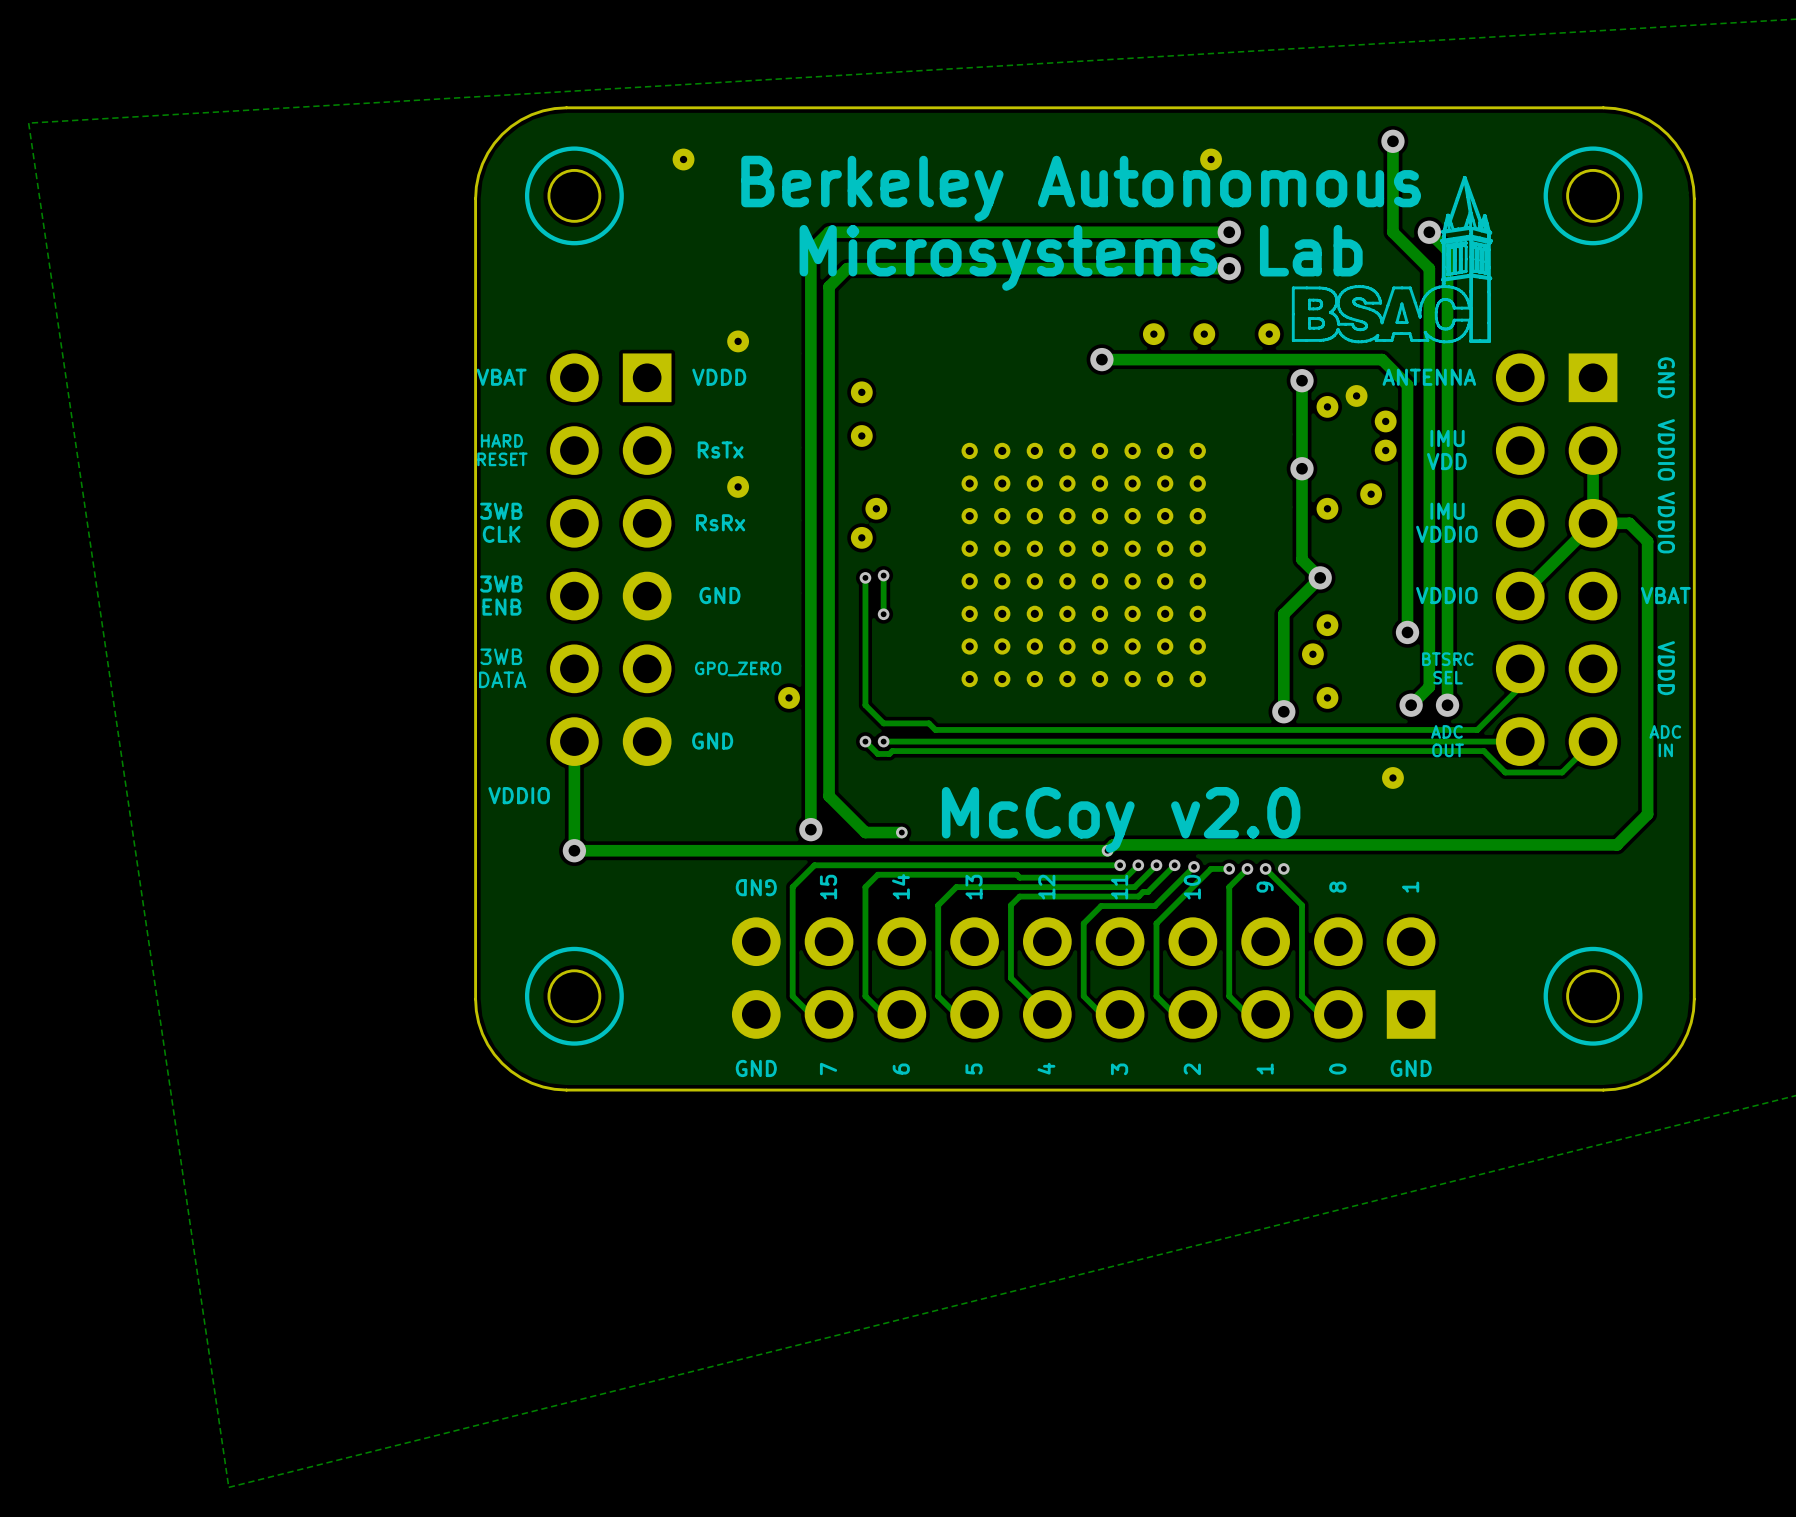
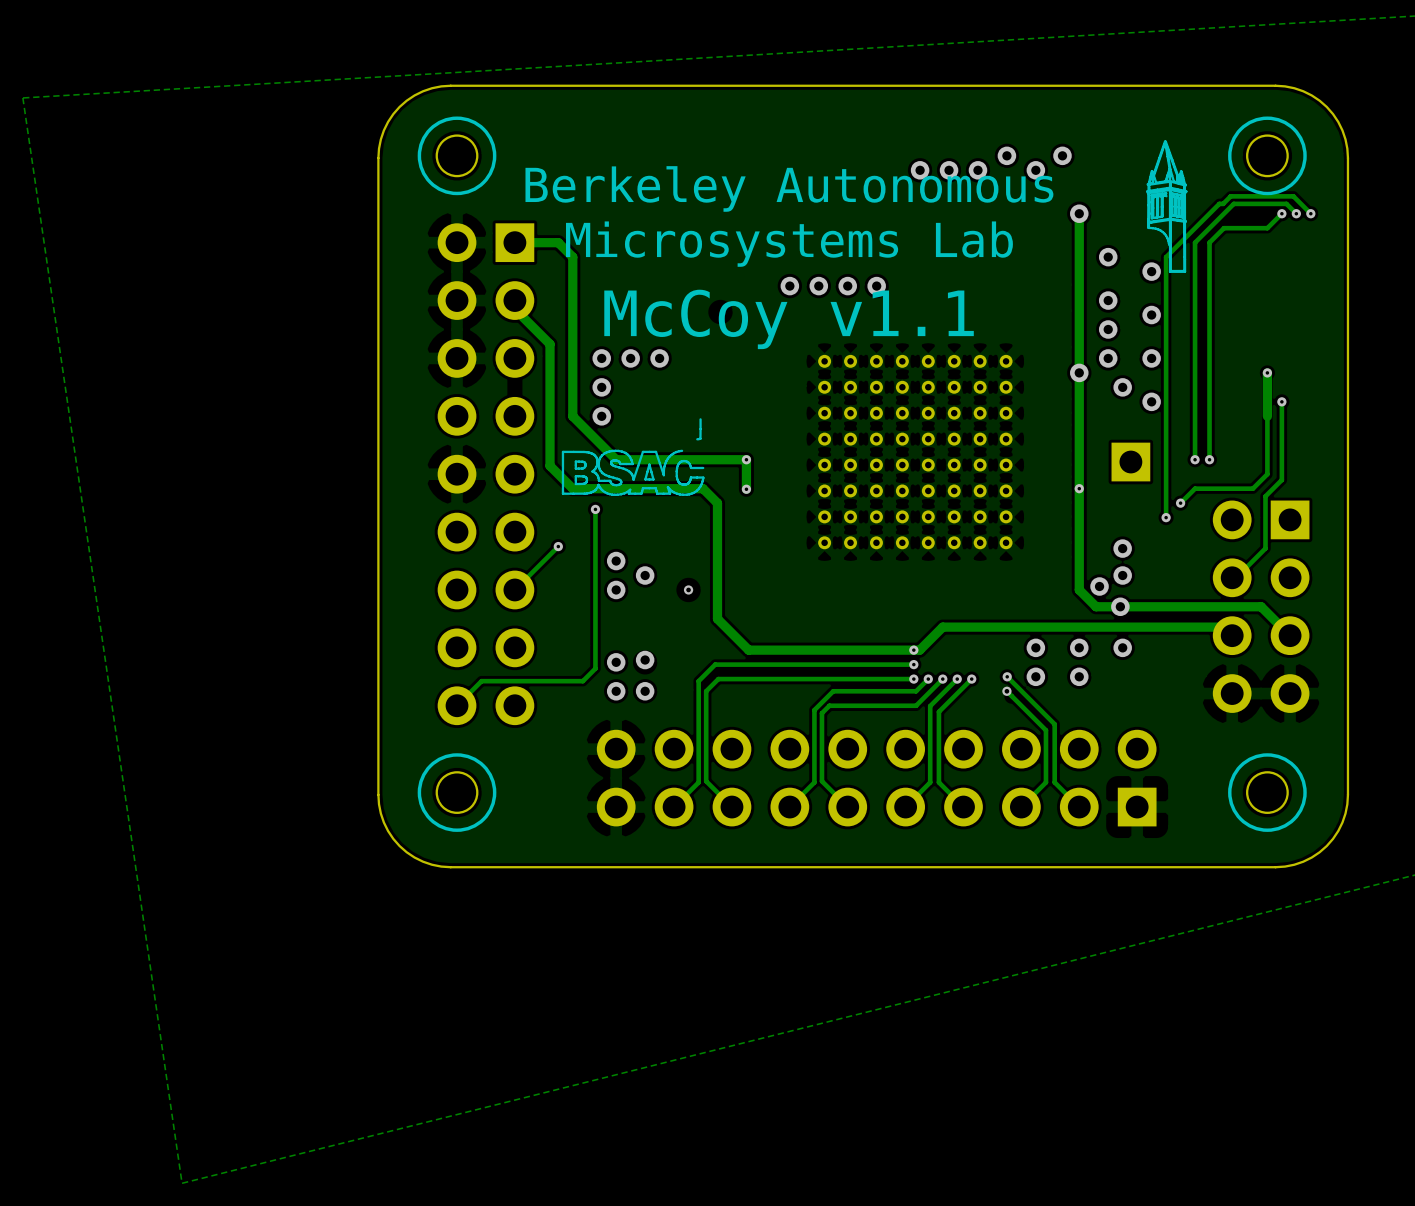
track: (1392, 141) (1392, 232) (1429, 268) (1429, 687) (1411, 705) -> none
via: (1392, 141) -> none
part: (683, 159) -> none
part: (1211, 159) -> none
text position: Berkeley Autonomous (1081, 188) -> Berkeley Autonomous (789, 188)
via: none -> (1006, 155)
via: none -> (1062, 155)
via: none -> (920, 170)
via: none -> (949, 170)
via: none -> (1035, 170)
track: (1229, 232) (829, 232) (810, 250) (810, 829) -> none
via position: (1229, 232) -> (977, 170)
track: (1429, 232) (1447, 250) (1447, 705) -> none
via: (1429, 232) -> none
line: (1466, 247) (1466, 271) (1462, 272) -> (700, 419) (700, 438) (697, 439)
text position: Microsystems Lab (1081, 257) -> Microsystems Lab (789, 244)
track: (1229, 268) (847, 268) (829, 286) (829, 796) (865, 832) (901, 832) -> none
via: (1229, 268) -> none
track: none -> (1079, 213) (1079, 589) (1096, 606) (1261, 606) (1290, 635)
via: none -> (1079, 213)
track: none -> (1281, 213) (1267, 228) (1223, 228) (1209, 242) (1209, 459)
via: none -> (1281, 213)
track: none -> (1296, 213) (1286, 203) (1233, 203) (1195, 242) (1195, 459)
via: none -> (1296, 213)
track: none -> (1310, 213) (1293, 196) (1230, 196) (1223, 203) (1219, 203) (1166, 257) (1166, 517)
via: none -> (1310, 213)
line: (1443, 286) (1432, 289) (1425, 296) (1420, 306) (1420, 317) (1410, 287) (1393, 287) (1382, 322) (1376, 312) (1357, 305) (1353, 301) (1355, 299) (1360, 298) (1365, 302) -> (682, 450) (673, 453) (667, 458) (663, 475) (656, 451) (642, 451) (633, 479) (629, 471) (611, 462) (616, 460) (620, 463)
line: (1317, 300) (1309, 300) (1309, 308) (1320, 307) (1321, 302) (1317, 300) -> (582, 461) (575, 461) (575, 468) (584, 467) (585, 463) (582, 461)
line: (1380, 302) (1376, 293) (1367, 287) (1355, 286) (1345, 290) (1338, 299) (1340, 311) (1347, 317) (1364, 322) (1366, 326) (1364, 328) (1357, 329) (1352, 324) -> (632, 463) (629, 455) (622, 451) (612, 450) (604, 453) (599, 461) (600, 470) (621, 482) (614, 485) (610, 480)
line: (1380, 303) (1365, 303) -> (632, 464) (620, 464)
line: (1401, 303) (1396, 322) (1407, 322) (1404, 313) (1401, 303) -> (649, 464) (645, 479) (653, 479) (651, 472) (649, 464)
track: none -> (514, 242) (558, 242) (572, 257) (572, 416) (616, 459) (746, 459) (746, 489)
line: (1454, 307) (1449, 300) (1443, 299) (1438, 303) (1436, 318) (1440, 327) (1449, 328) (1454, 320) (1469, 320) -> none
line: (1469, 308) (1454, 308) -> (703, 467) (691, 467)
line: (1312, 318) (1309, 318) (1309, 328) (1322, 325) (1321, 319) (1312, 318) -> none
line: (1469, 320) (1464, 334) (1452, 341) (1436, 340) (1425, 332) -> none
via: none -> (1108, 257)
line: (1352, 324) (1338, 324) (1336, 316) (1330, 312) (1336, 303) (1335, 296) (1331, 291) (1319, 287) (1293, 287) (1293, 340) (1326, 339) (1334, 335) (1338, 329) (1343, 336) (1355, 341) (1366, 341) (1377, 335) (1376, 340) (1391, 340) (1393, 333) (1409, 333) (1411, 340) -> none
line: (1425, 332) (1427, 340) (1411, 340) -> (667, 487) (670, 493) (657, 493)
part: (1153, 334) -> none
part: (1204, 334) -> none
part: (1269, 334) -> none
part: (738, 341) -> none
via: none -> (1151, 271)
via: none -> (789, 286)
via: none -> (818, 286)
via: none -> (847, 286)
track: (1101, 359) (1382, 359) (1407, 385) (1407, 632) -> none
text: VBAT (501, 377) -> none
text: VDDD (719, 377) -> none
via: none -> (1108, 300)
text: ANTENNA (1429, 377) -> none
text: GND (1666, 377) -> none
track: (1302, 380) (1302, 559) (1320, 577) (1283, 614) (1283, 711) -> none
via: (1302, 380) -> none
part: (861, 392) -> none
part: (1356, 395) -> none
via: none -> (1151, 315)
track: none -> (523, 317) (550, 344) (550, 465) (572, 488) (703, 488) (717, 503) (717, 618) (748, 650) (919, 650) (942, 627) (1232, 627) (1232, 635)
text: none -> McCoy v1.1 (789, 319)
part: (1327, 406) -> none
via: none -> (1108, 329)
part: (1385, 421) -> none
part: (861, 436) -> none
text: IMU (1447, 438) -> none
text: HARD (501, 440) -> none
text: VDDIO (1666, 449) -> none
text: RsTx (720, 450) -> none
via: none -> (601, 358)
via: none -> (630, 358)
via: none -> (659, 358)
part: (1385, 450) -> none
via: none -> (1108, 358)
via: none -> (1151, 358)
text: RESET (502, 459) -> none
text: VDD (1446, 461) -> none
via: (1302, 468) -> none
via: none -> (1079, 372)
via: none -> (1267, 372)
part: (738, 486) -> none
via: none -> (601, 387)
via: none -> (1122, 387)
part: (1371, 494) -> none
via: none -> (1151, 401)
track: none -> (1281, 401) (1281, 479) (1265, 496) (1265, 548) (1236, 577) (1232, 577)
via: none -> (1281, 401)
part: (876, 508) -> none
part: (1327, 508) -> none
text: 3WB (501, 511) -> none
text: IMU (1447, 511) -> none
text: RsRx (720, 522) -> none
text: VDDIO (1666, 522) -> none
via: none -> (601, 416)
track: none -> (1267, 416) (1267, 474) (1252, 488) (1195, 488) (1180, 503)
text: CLK (501, 534) -> none
text: VDDIO (1446, 534) -> none
part: (861, 537) -> none
part: (610, 559) -> none
part: (1556, 559) -> none
part position: (1083, 564) -> (915, 452)
track: (883, 575) (883, 614) -> none
via: (883, 575) -> none
track: (865, 577) (865, 705) (883, 723) (928, 723) (935, 729) (1477, 729) (1520, 687) (1520, 668) -> none
via: (865, 577) -> none
via: none -> (746, 459)
via: (1320, 577) -> none
via: none -> (1195, 459)
via: none -> (1209, 459)
part: none -> (1130, 462)
text: 3WB (501, 584) -> none
line: none -> (691, 467) (686, 461) (679, 462) (677, 468) (677, 479) (680, 483) (685, 484) (689, 482) (690, 477) (703, 477) (697, 490) (682, 494) (674, 492) (668, 487)
text: GND (719, 595) -> none
text: VDDIO (1446, 595) -> none
text: VBAT (1665, 595) -> none
part: none -> (485, 474)
track: (1520, 596) (1593, 523) (1629, 523) (1647, 541) (1647, 814) (1617, 844) (1113, 844) (1107, 850) (574, 850) (574, 741) -> none
line: none -> (582, 476) (586, 478) (585, 482) (575, 484) (575, 476) (582, 476)
line: none -> (610, 480) (598, 480) (597, 474) (592, 471) (597, 464) (596, 458) (593, 454) (583, 451) (562, 451) (562, 493) (589, 493) (595, 489) (598, 484) (602, 490) (612, 494) (621, 494) (630, 489) (628, 493) (641, 493) (642, 488) (655, 488) (657, 493)
text: ENB (501, 607) -> none
via: (883, 614) -> none
via: none -> (746, 489)
via: none -> (1079, 488)
part: (1327, 625) -> none
via: (1407, 632) -> none
via: none -> (1180, 503)
track: none -> (595, 509) (595, 668) (582, 681) (481, 681) (457, 705)
via: none -> (595, 509)
via: none -> (1166, 517)
part: (1312, 654) -> none
text: 3WB (501, 656) -> none
text: BTSRC (1447, 659) -> none
text: GPO_ZERO (738, 668) -> none
text: VDDD (1666, 668) -> none
text: SEL (1448, 677) -> none
text: DATA (502, 679) -> none
track: none -> (558, 546) (514, 589)
via: none -> (558, 546)
via: none -> (1122, 548)
part: (789, 697) -> none
part: (1327, 697) -> none
via: none -> (616, 561)
via: (1411, 705) -> none
via: (1447, 705) -> none
via: (1283, 711) -> none
via: none -> (645, 575)
via: none -> (1122, 575)
text: ADC (1446, 731) -> none
text: ADC (1665, 731) -> none
via: none -> (1099, 586)
text: GND (712, 741) -> none
via: none -> (616, 589)
via: (883, 741) -> none
track: (1520, 741) (883, 741) -> none
track: (1593, 741) (1562, 772) (1505, 772) (1483, 751) (892, 751) (889, 753) (877, 753) (865, 741) -> none
text: OUT (1448, 750) -> none
text: IN (1665, 750) -> none
via: none -> (1120, 606)
part: none -> (1261, 606)
part: (1392, 777) -> none
text: VDDIO (519, 795) -> none
via: none -> (1035, 647)
via: none -> (1079, 647)
via: none -> (1122, 647)
via: none -> (913, 650)
text: McCoy v2.0 (1121, 819) -> none
via: none -> (616, 662)
via: (901, 832) -> none
track: none -> (913, 664) (715, 664) (698, 681) (698, 782) (674, 807)
via: none -> (913, 664)
via: (574, 850) -> none
via: (1107, 850) -> none
track: none -> (1007, 676) (1054, 724) (1054, 782) (1079, 807)
via: none -> (1007, 676)
via: none -> (1035, 676)
via: none -> (1079, 676)
track: none -> (913, 679) (718, 679) (706, 691) (706, 781) (731, 807)
via: none -> (913, 679)
track: none -> (928, 679) (916, 691) (833, 691) (814, 710) (814, 782) (789, 807)
via: none -> (928, 679)
via: none -> (942, 679)
track: none -> (957, 679) (930, 706) (930, 782) (905, 807)
via: none -> (957, 679)
track: none -> (971, 679) (938, 711) (938, 782) (963, 807)
via: none -> (971, 679)
track: (1120, 865) (814, 865) (792, 887) (792, 996) (810, 1014) (829, 1014) -> none
via: (1120, 865) -> none
track: (1138, 865) (1125, 877) (1019, 877) (1016, 874) (877, 874) (865, 887) (865, 996) (883, 1014) (901, 1014) -> none
via: (1138, 865) -> none
track: (1156, 865) (1134, 887) -> (942, 679) (916, 705) (902, 705)
via: (1156, 865) -> none
track: (1174, 865) (1147, 891) (1143, 891) (1138, 896) (1019, 896) (1010, 905) (1010, 978) (1047, 1014) -> none
via: (1174, 865) -> none
track: (1194, 866) (1154, 906) (1101, 906) (1083, 923) (1083, 996) (1101, 1014) (1120, 1014) -> none
via: (1194, 866) -> none
via: none -> (616, 691)
via: none -> (645, 691)
track: (1229, 868) (1211, 868) (1156, 923) (1156, 996) (1174, 1014) (1192, 1014) -> none
via: (1229, 868) -> none
track: (1247, 868) (1229, 887) (1229, 996) (1247, 1014) (1265, 1014) -> none
via: (1247, 868) -> none
via: (1283, 868) -> none
text: 14 (900, 886) -> none
text: GND (756, 887) -> none
text: 15 (828, 887) -> none
text: 13 (974, 887) -> none
track: (1042, 887) (956, 887) (938, 905) (938, 996) (956, 1014) (974, 1014) -> (829, 705) (821, 713) (821, 781) (847, 807)
text: 12 (1046, 887) -> none
text: 11 (1119, 887) -> none
text: 10 (1192, 887) -> none
text: 9 (1265, 887) -> none
text: 8 (1337, 887) -> none
text: 1 (1410, 887) -> none
track: (1302, 905) (1302, 996) (1320, 1014) (1338, 1014) -> (1035, 720) (1045, 730) (1045, 782) (1021, 807)
part position: (1083, 978) -> (876, 778)
text: GND (756, 1068) -> none
text: 4 (1046, 1068) -> none
text: GND (1411, 1068) -> none
text: 7 (828, 1069) -> none
text: 6 (901, 1069) -> none
text: 5 (974, 1069) -> none
text: 3 (1119, 1069) -> none
text: 2 (1192, 1069) -> none
text: 1 (1265, 1069) -> none
text: 0 (1337, 1069) -> none

